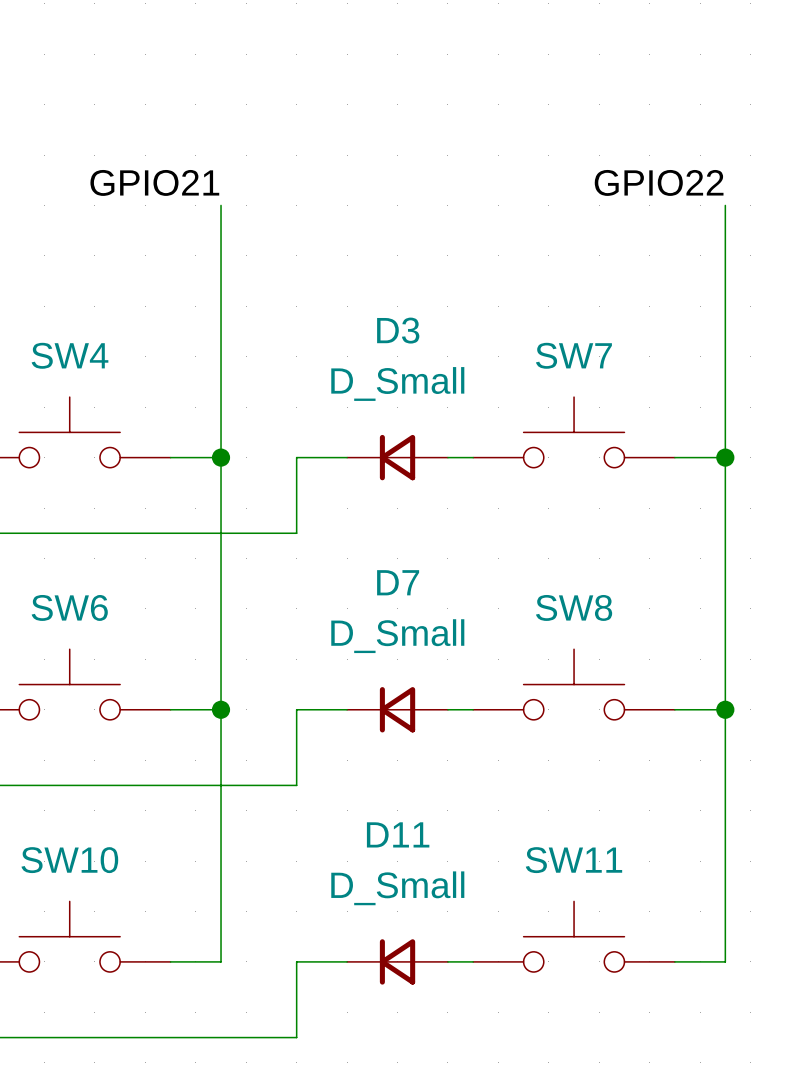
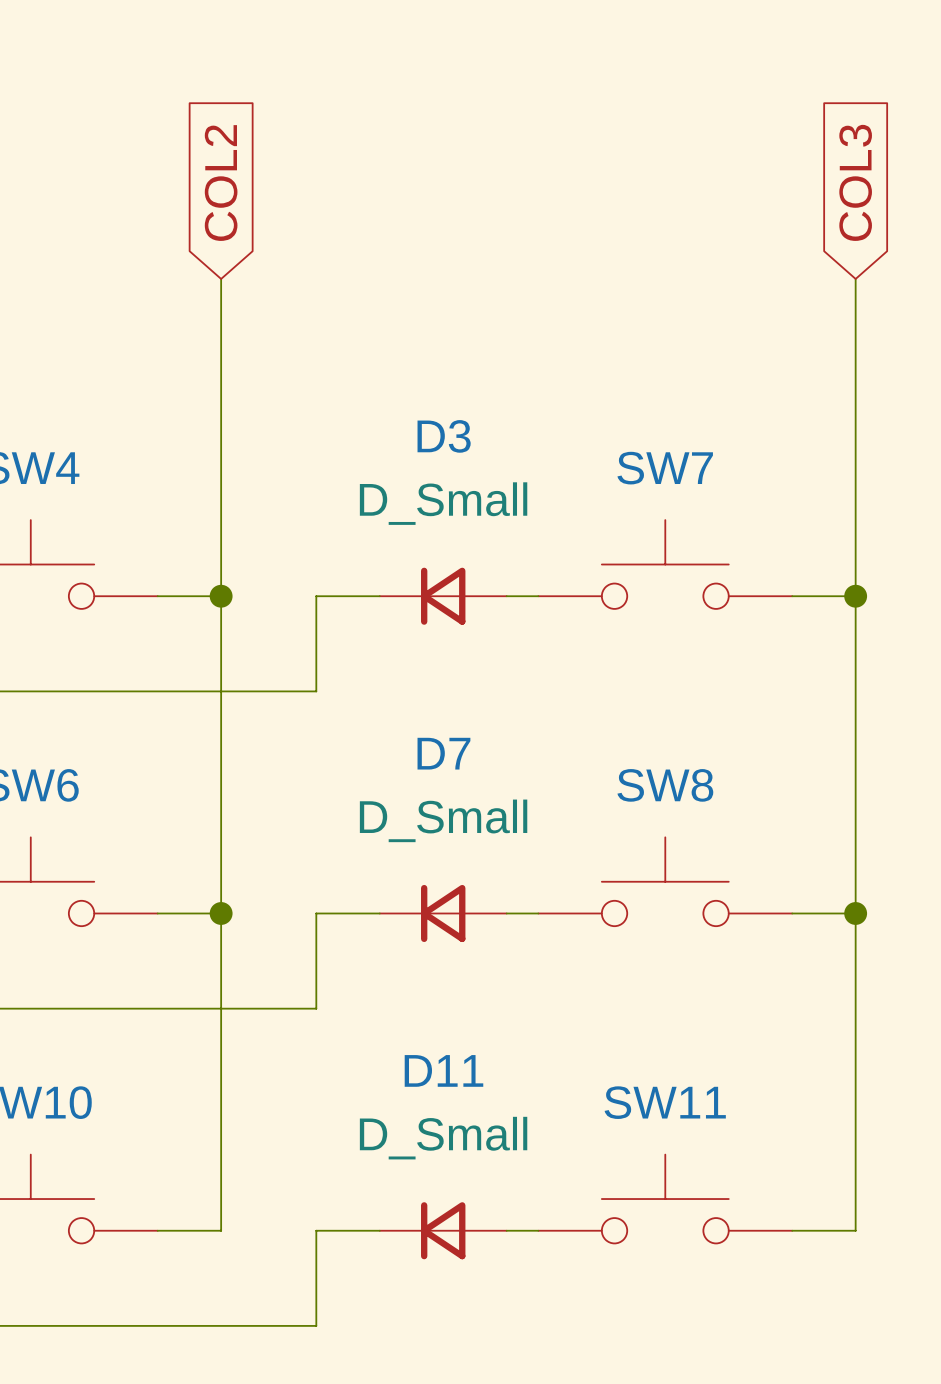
global label: none -> COL2 (221, 183)
global label: none -> COL3 (855, 182)
label: GPIO21 (154, 182) -> none
label: GPIO22 (659, 182) -> none

